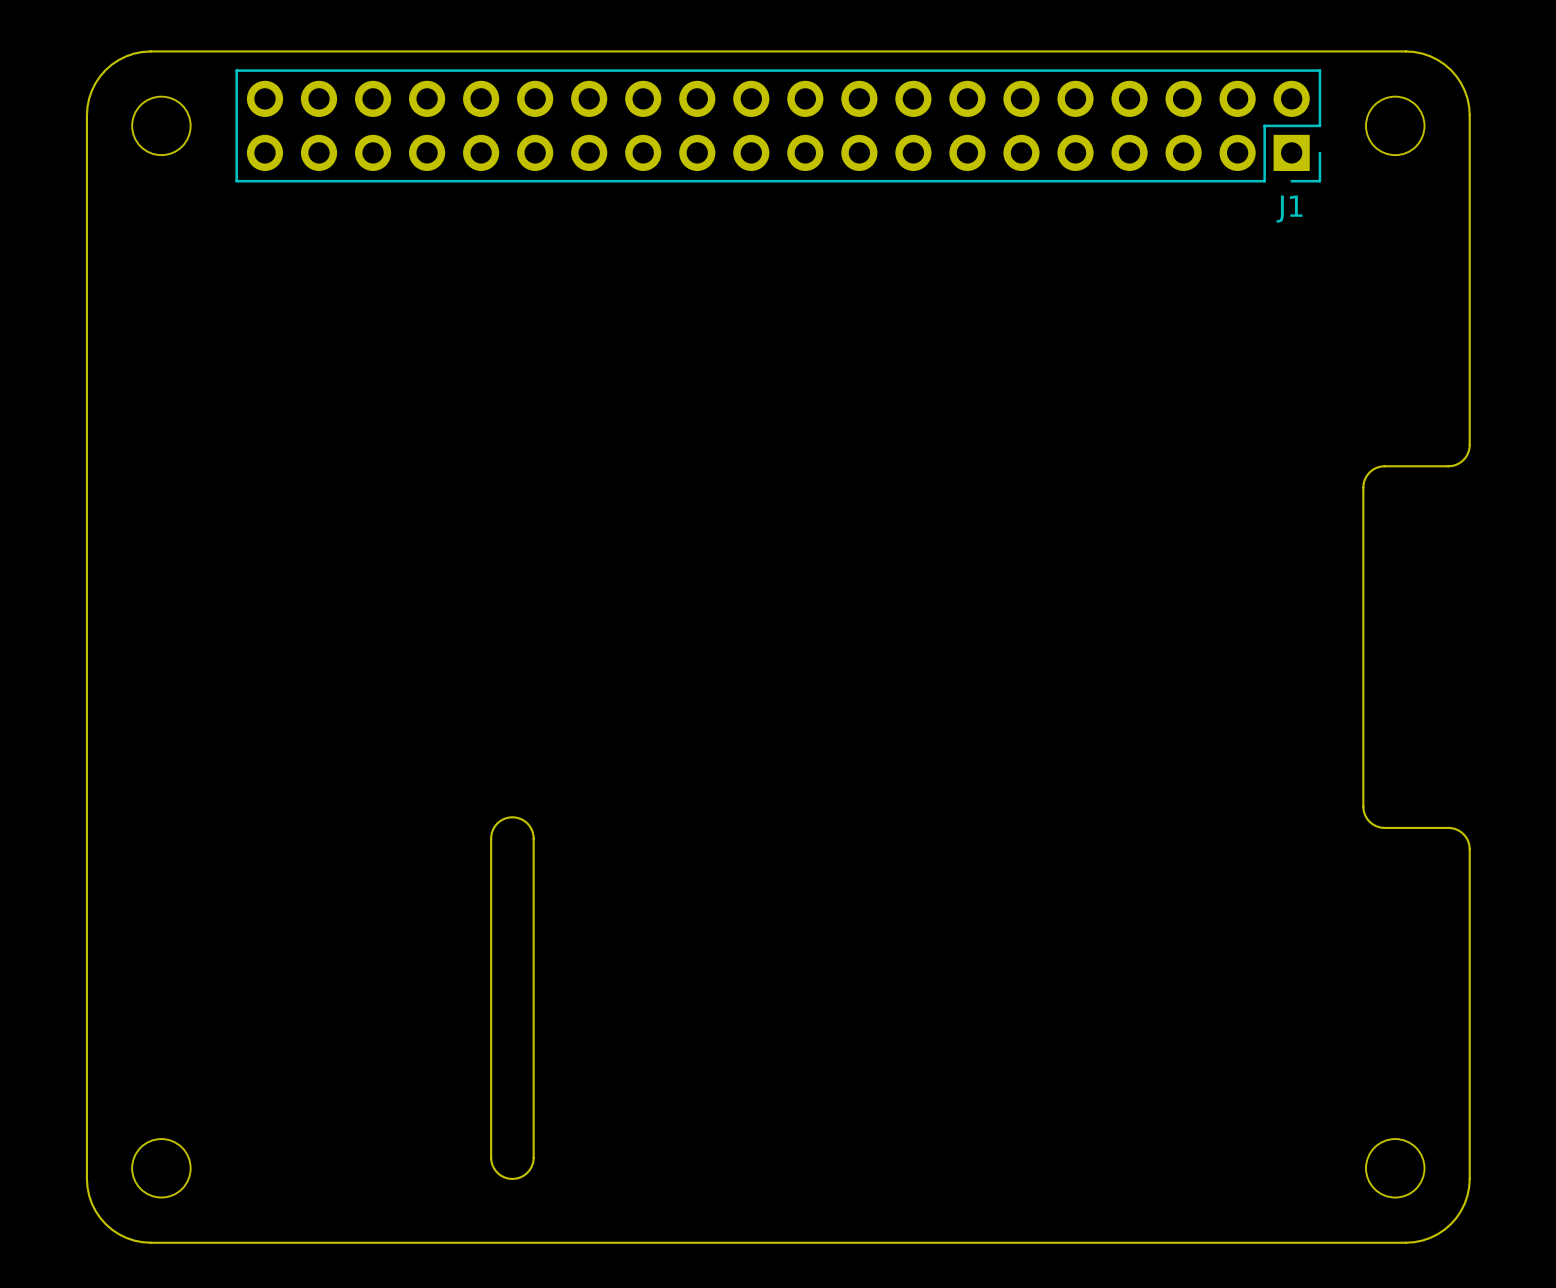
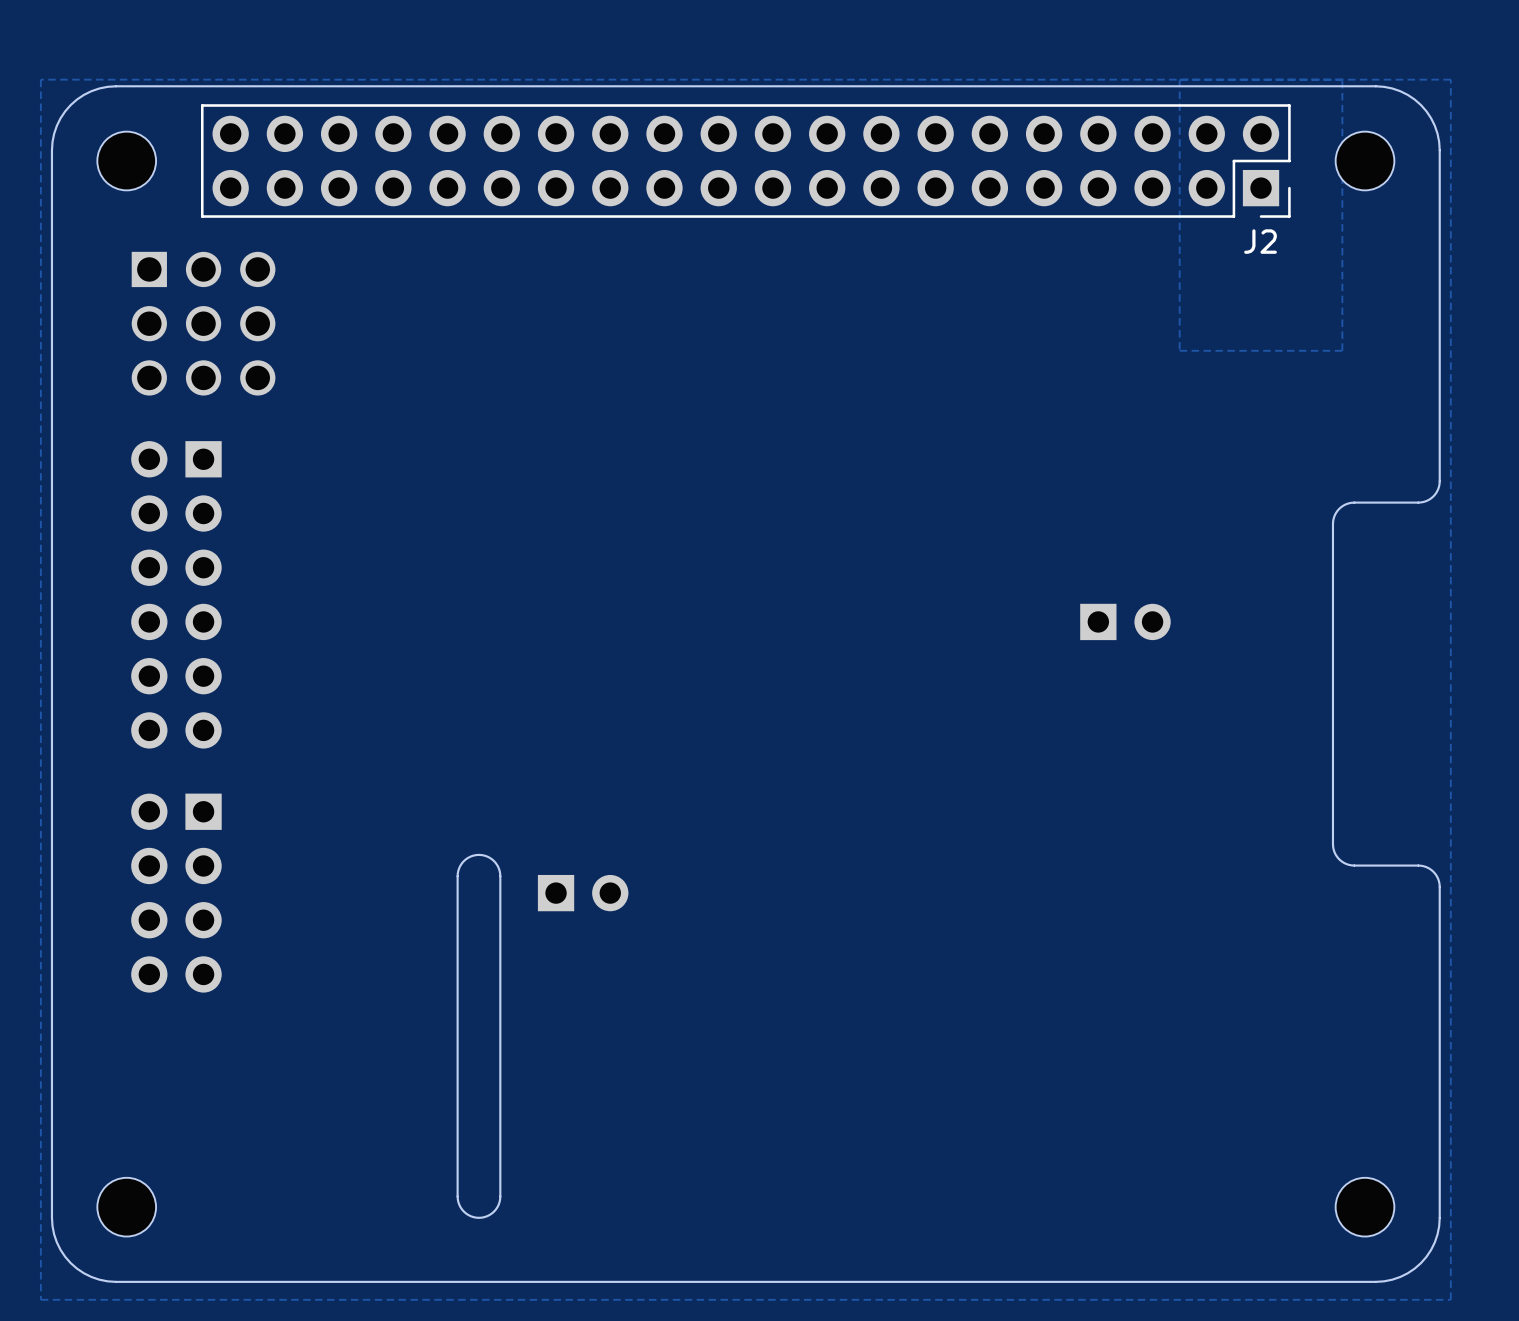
zone outline: none -> (1342, 79) (1342, 350) (1179, 350) (1179, 79)
zone outline: none -> (1450, 79) (1450, 1299) (40, 1299) (40, 79) (1450, 79)
J1 name: J1 (1289, 209) -> J2 (1260, 241)
part: none -> (203, 323)
part: none -> (176, 594)
part: none -> (1125, 621)
part: none -> (176, 893)
part: none -> (583, 893)

